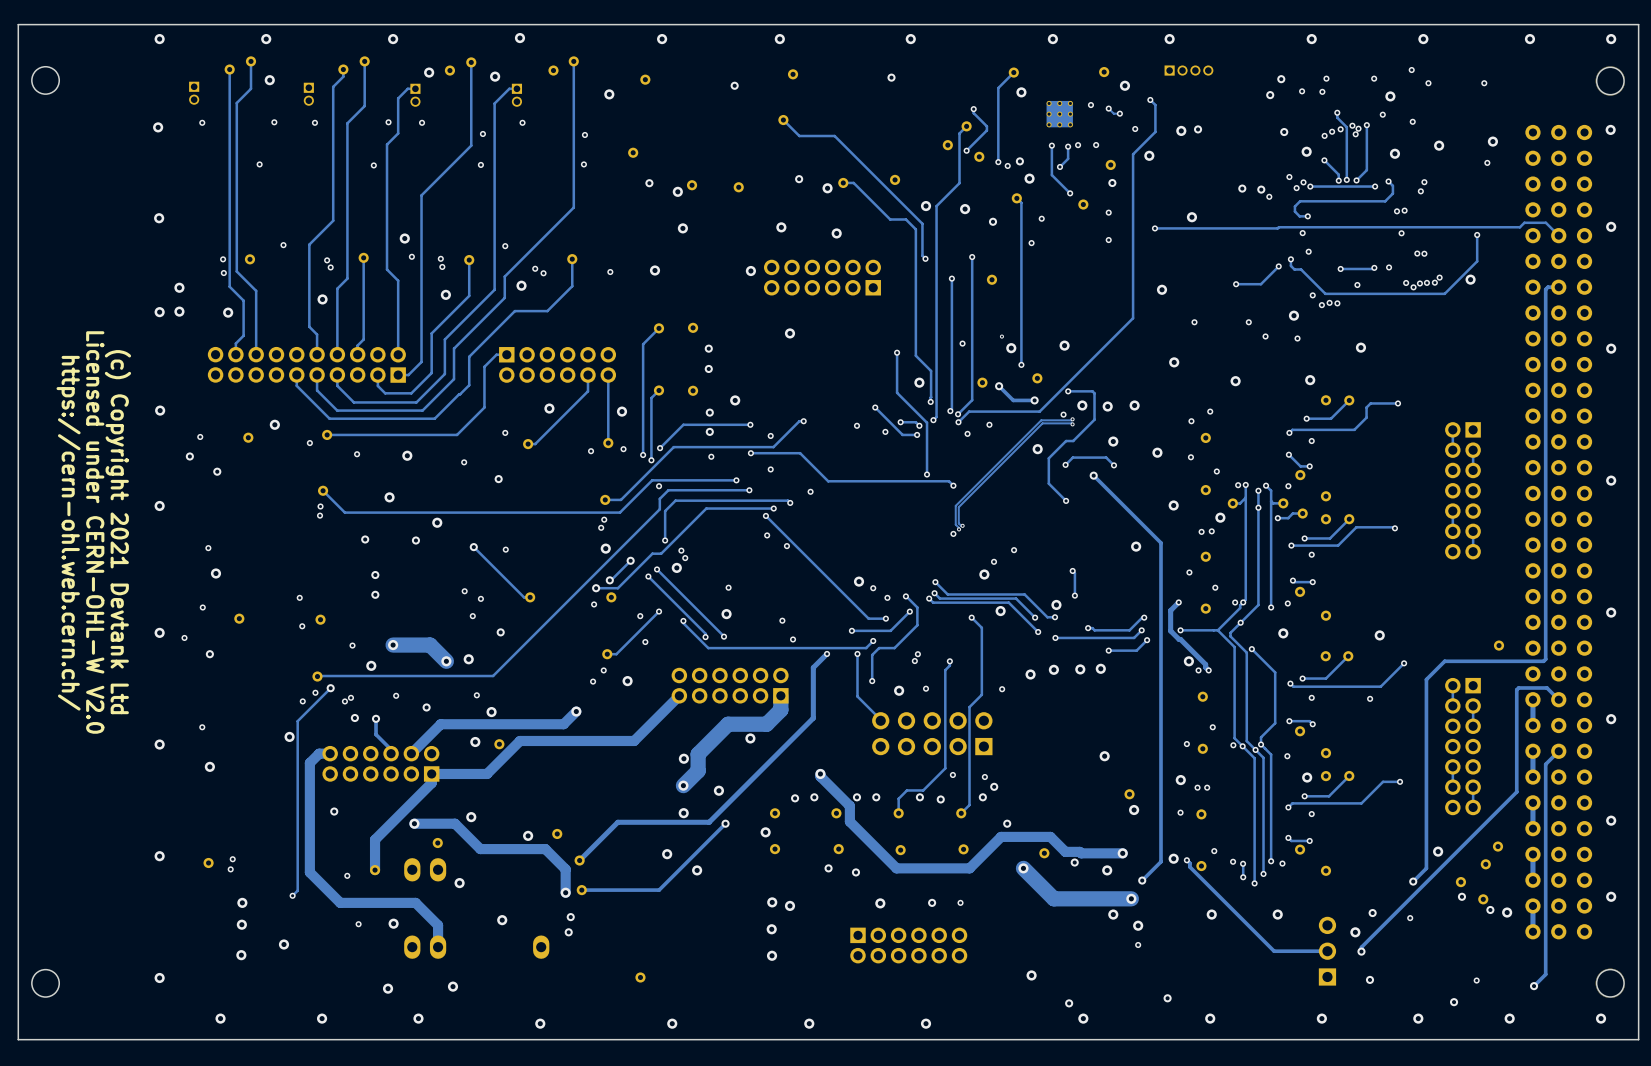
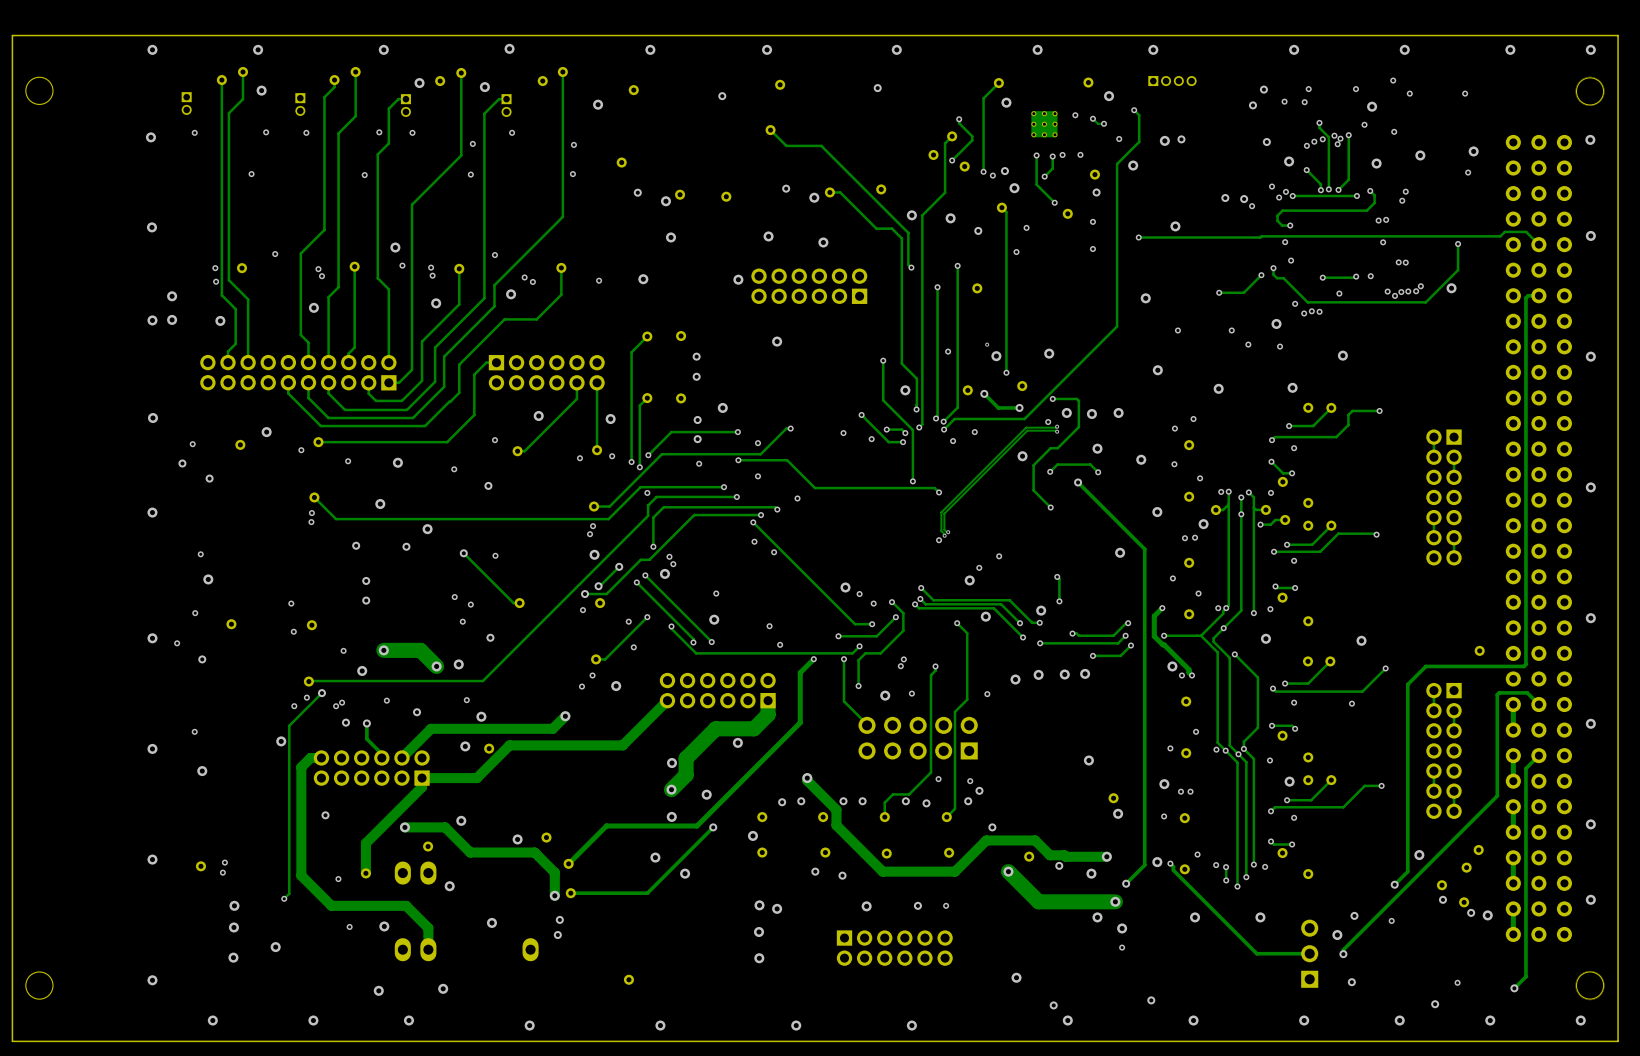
text: Licensed under CERN-OHL-W V2.0 (95, 532) -> none
text: (c) Copyright 2021 Devtank Ltd (117, 532) -> none
text: https://cern-ohl.web.cern.ch/ (68, 533) -> none

